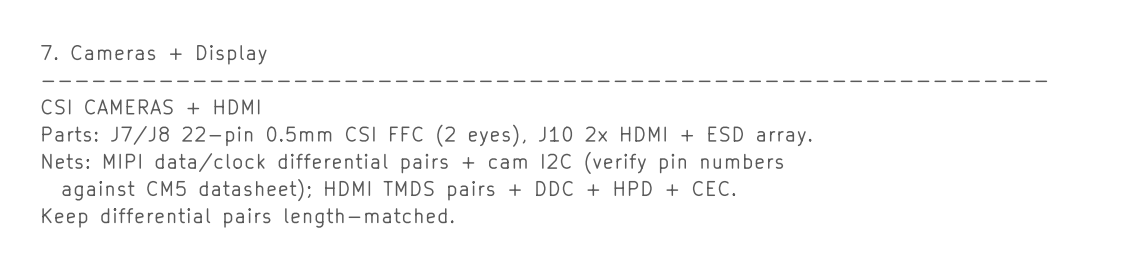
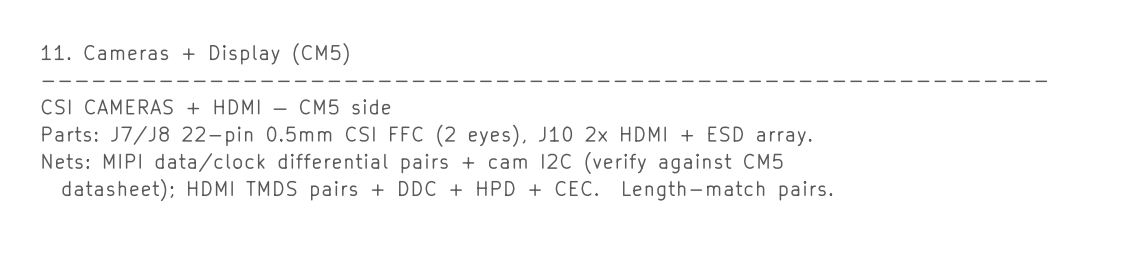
text: 7. Cameras + Display (153, 54) -> 11. Cameras + Display (CM5) (195, 54)
text: CSI CAMERAS + HDMI (150, 106) -> CSI CAMERAS + HDMI — CM5 side (215, 106)
text: Nets: MIPI data/clock differential pairs + cam I2C (verify pin numbers (412, 162) -> Nets: MIPI data/clock differential pairs + cam I2C (verify against CM5 (412, 162)
text: against CM5 datasheet); HDMI TMDS pairs + DDC + HPD + CEC. (398, 190) -> datasheet); HDMI TMDS pairs + DDC + HPD + CEC. Length-match pairs. (447, 190)
text: Keep differential pairs length-matched. (248, 217) -> none

